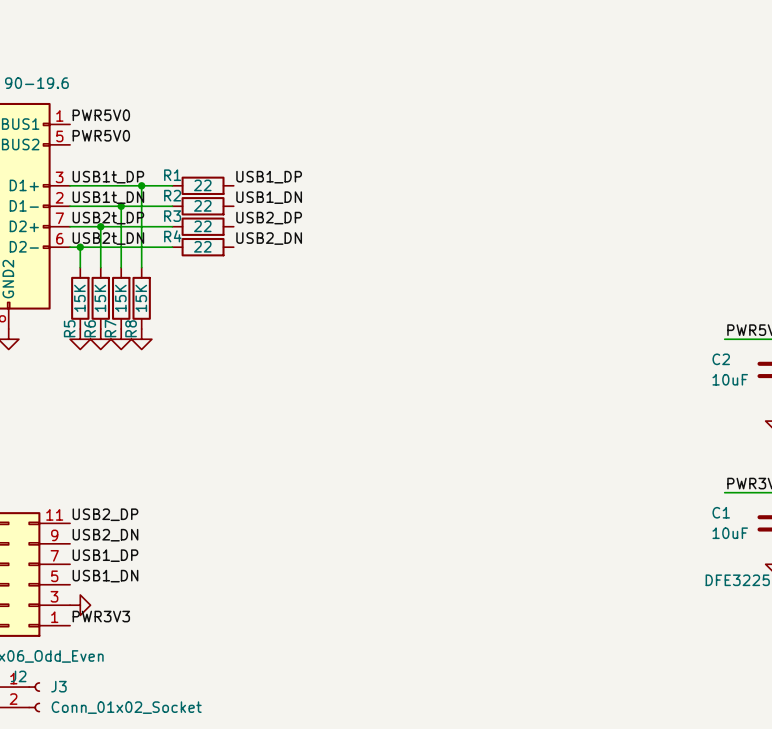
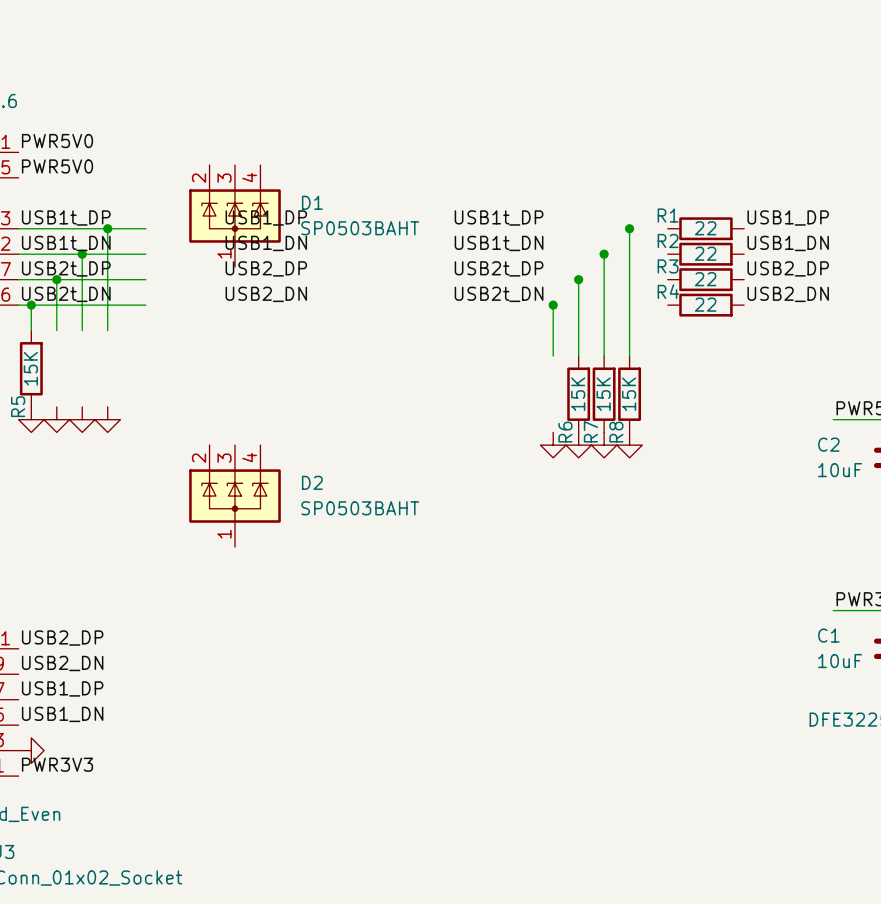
D1: none -> SP0503BAHT (234, 216)
label: none -> USB1t_DP (499, 217)
label: none -> USB1_DP (788, 217)
R1 position: (203, 185) -> (705, 228)
wire: none -> (629, 228) (629, 356)
junction: none -> (629, 228)
label: none -> USB1t_DN (499, 243)
label: none -> USB1_DN (788, 243)
R2 position: (203, 206) -> (705, 254)
wire: none -> (604, 254) (604, 356)
junction: none -> (604, 254)
label: none -> USB2t_DP (499, 268)
label: none -> USB2_DP (788, 268)
R3 position: (203, 226) -> (705, 279)
wire: none -> (578, 279) (578, 356)
junction: none -> (578, 279)
label: none -> USB2t_DN (499, 294)
label: none -> USB2_DN (788, 294)
R4 position: (203, 247) -> (705, 305)
wire: none -> (553, 305) (553, 356)
junction: none -> (553, 305)
R6 position: (100, 298) -> (578, 394)
R7 position: (121, 298) -> (604, 394)
R8 position: (141, 298) -> (629, 394)
power symbol: none -> (553, 445)
power symbol: none -> (578, 445)
power symbol: none -> (604, 445)
power symbol: none -> (629, 445)
D2: none -> SP0503BAHT (234, 496)

